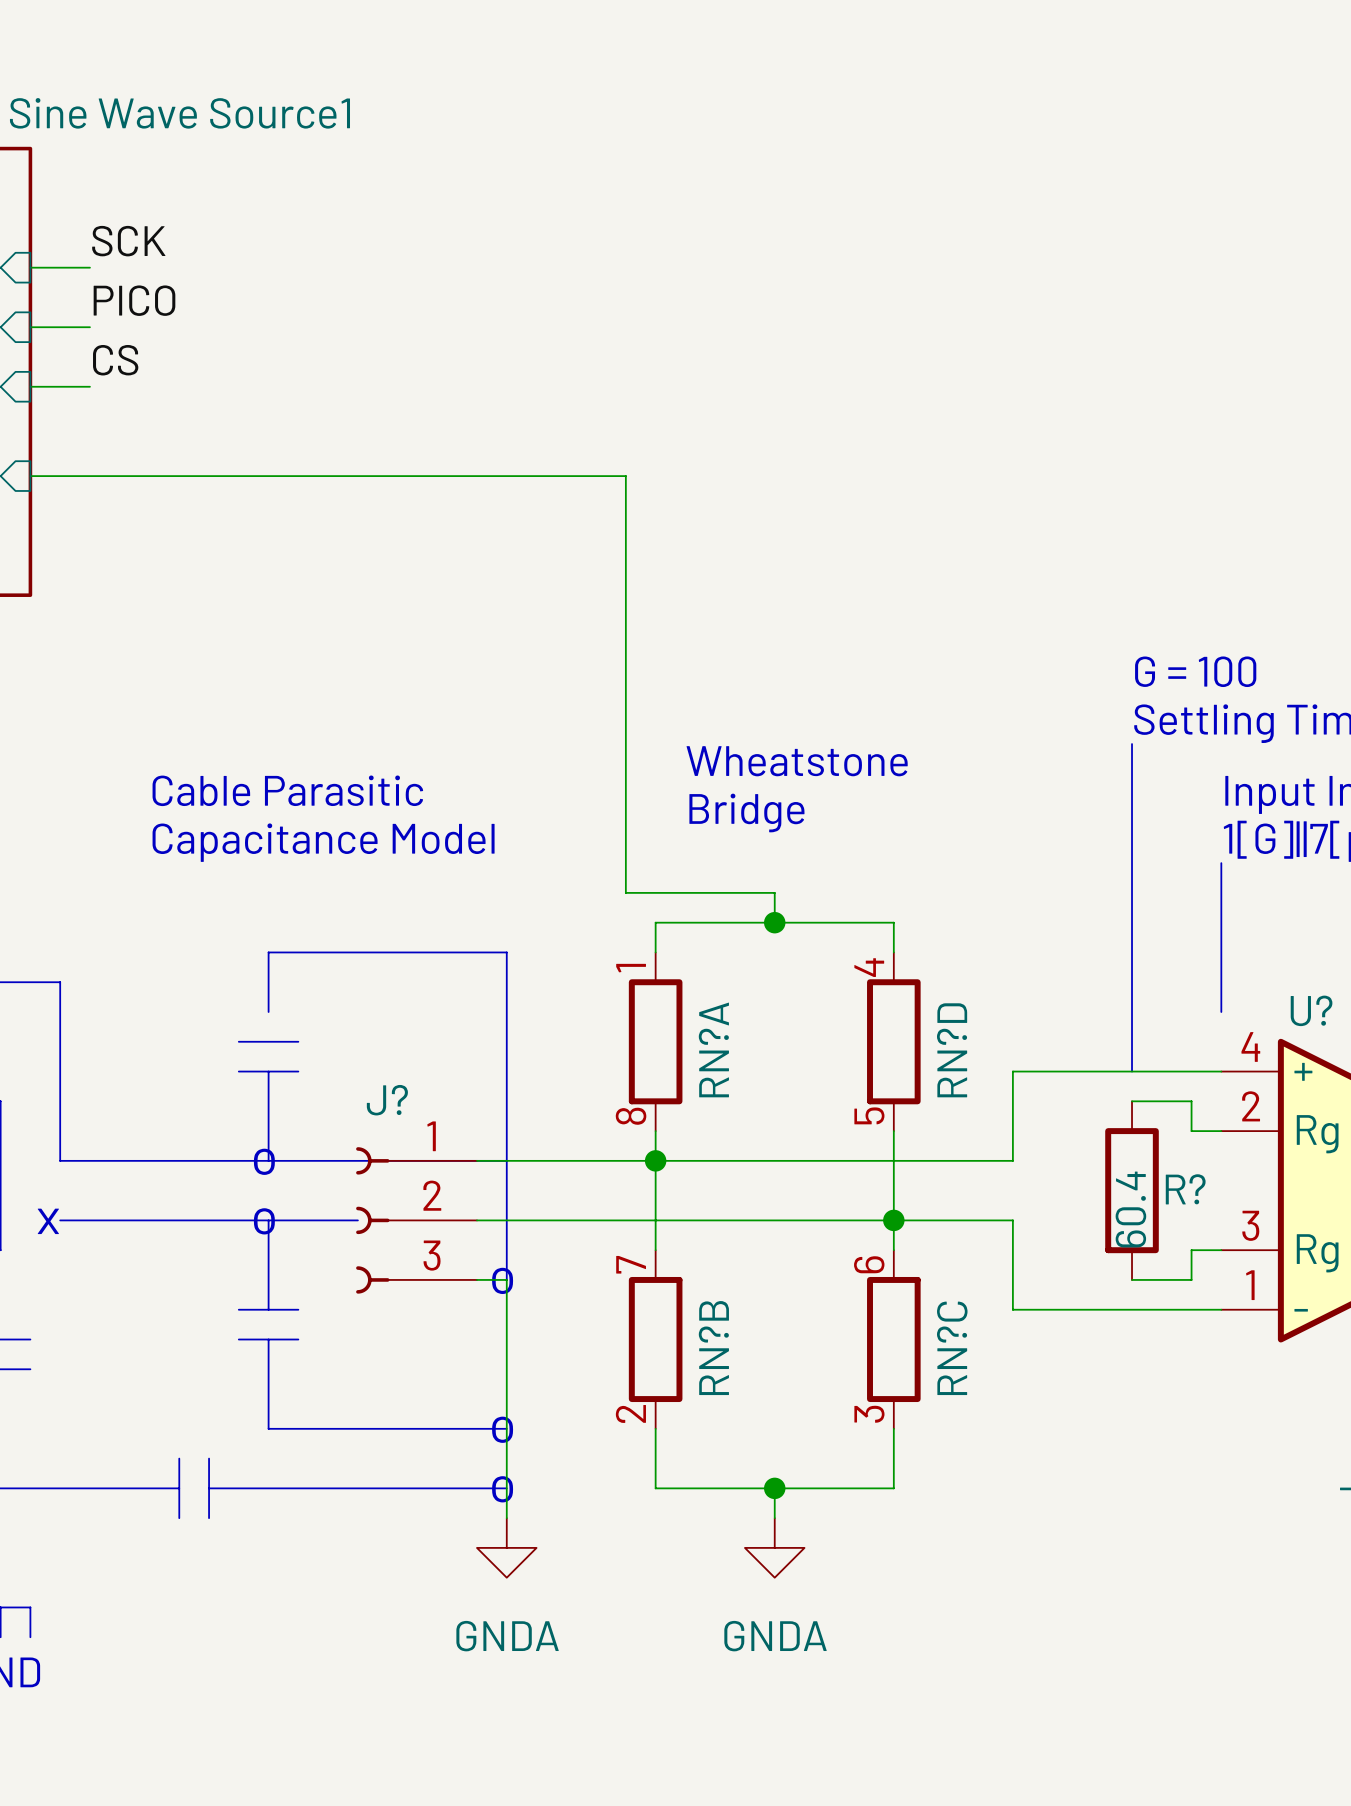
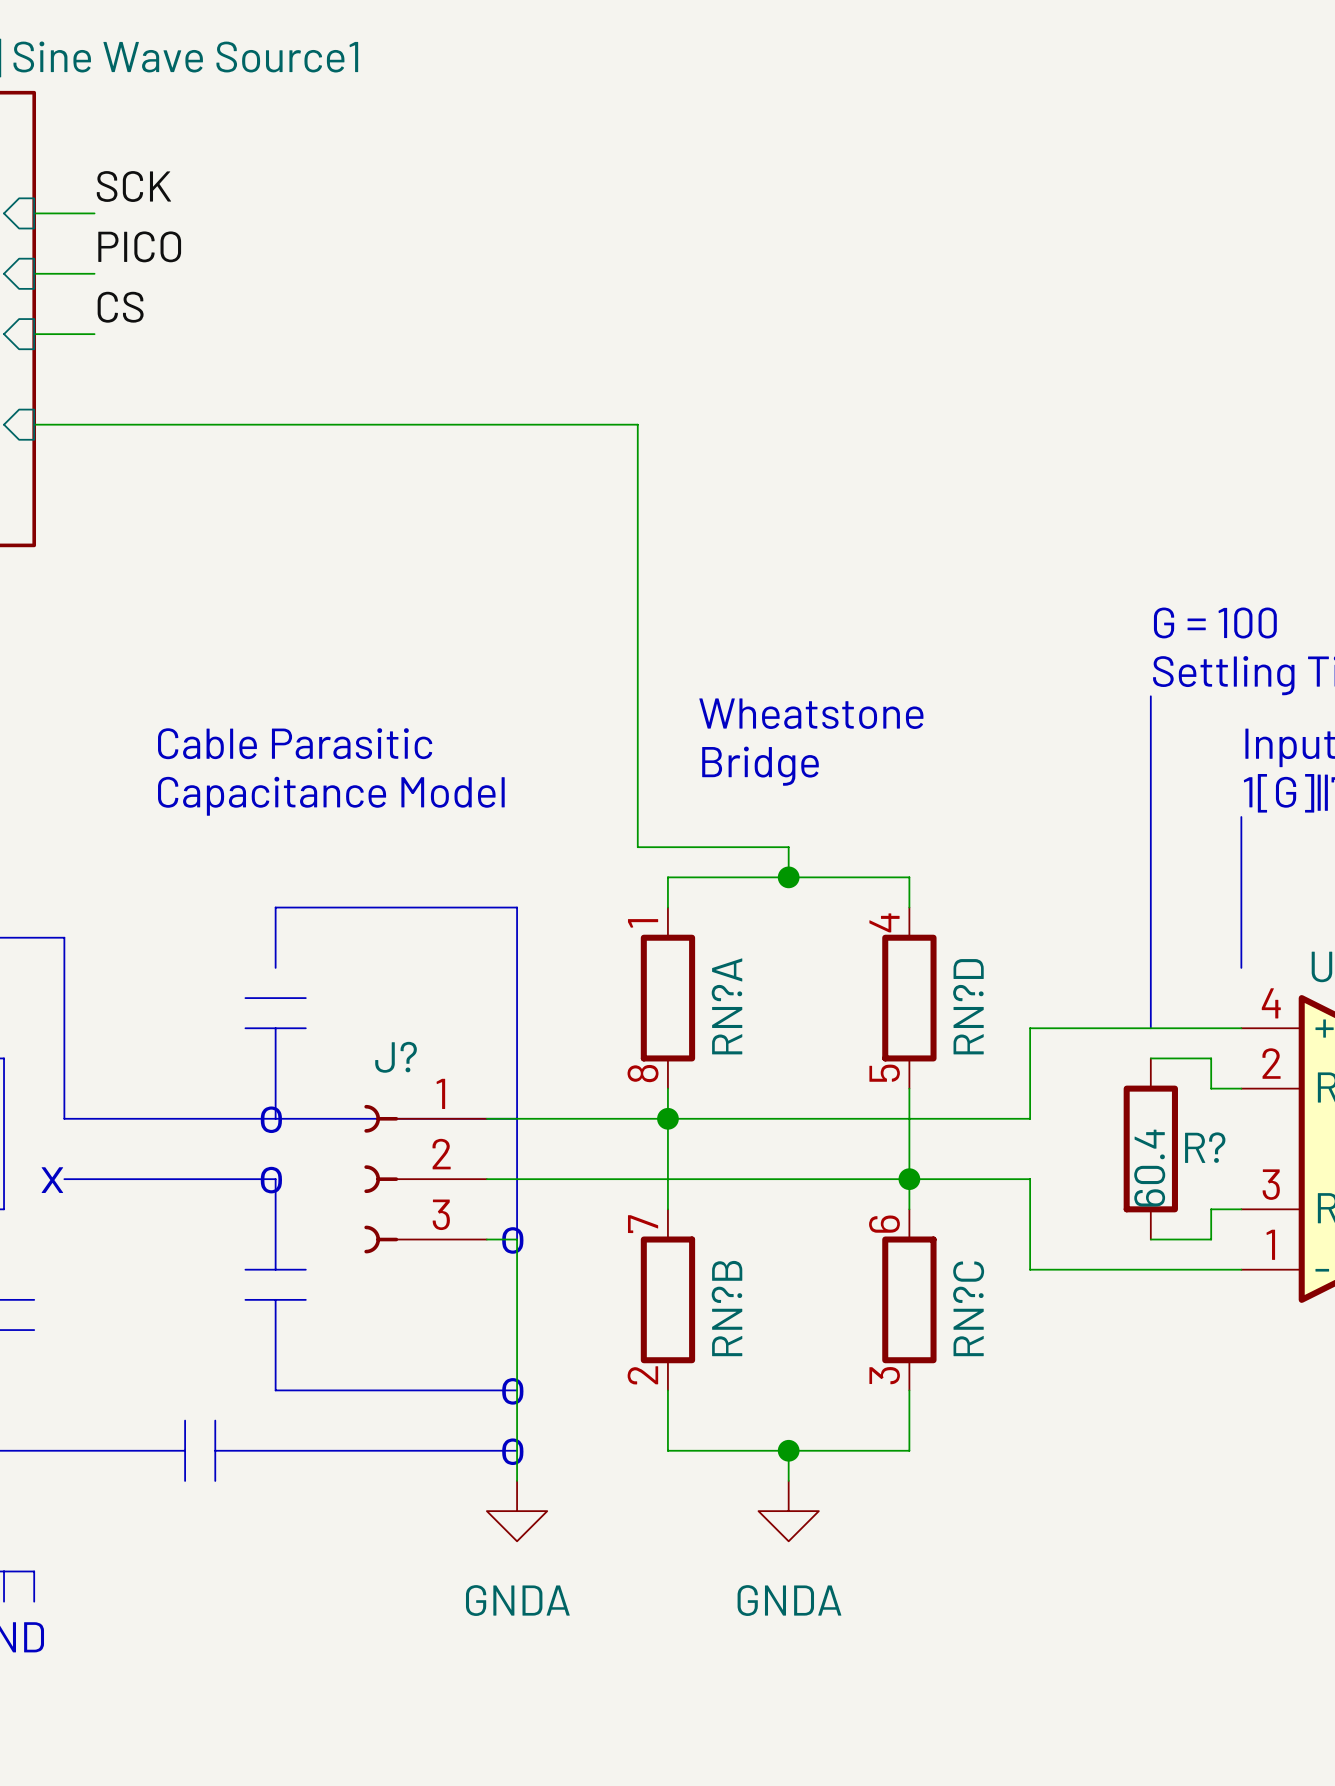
line: (268, 1220) (357, 1220) -> none

